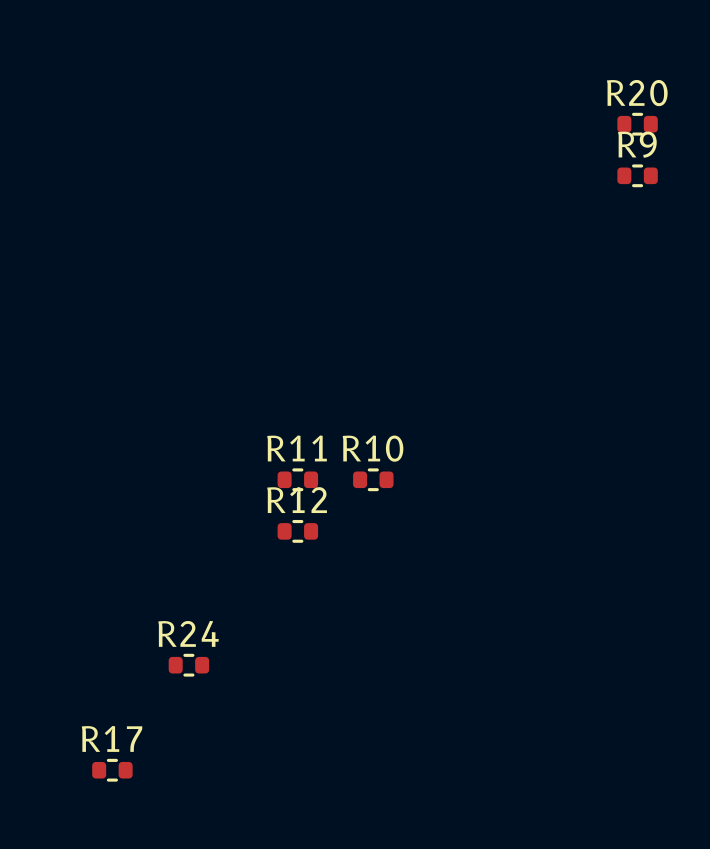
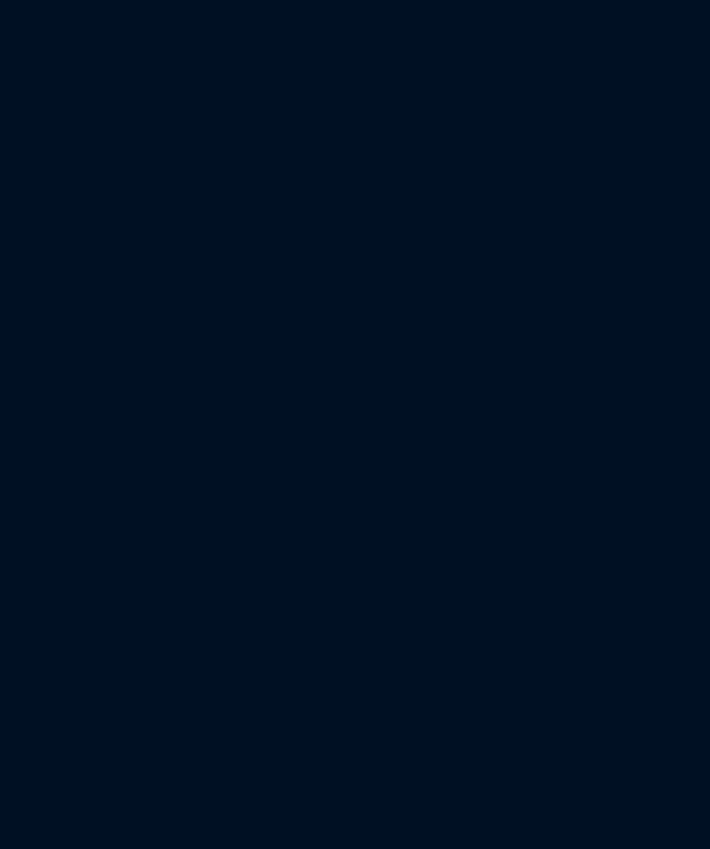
R20: (637, 124) -> none
R9: (637, 175) -> none
R11: (297, 479) -> none
R10: (373, 479) -> none
R12: (297, 531) -> none
R24: (188, 665) -> none
R17: (112, 770) -> none

